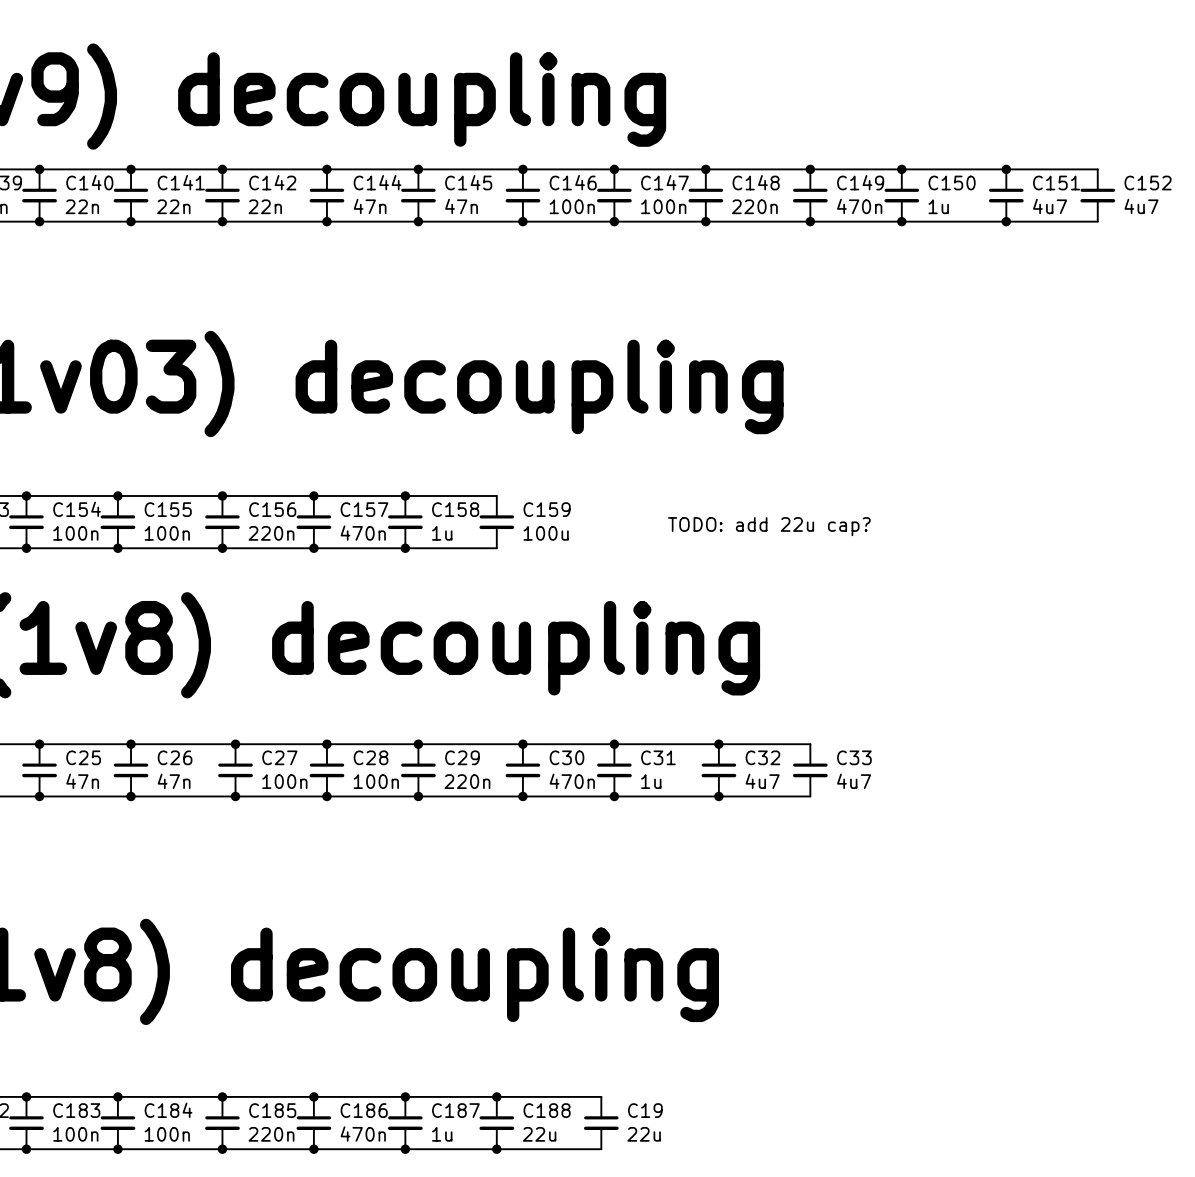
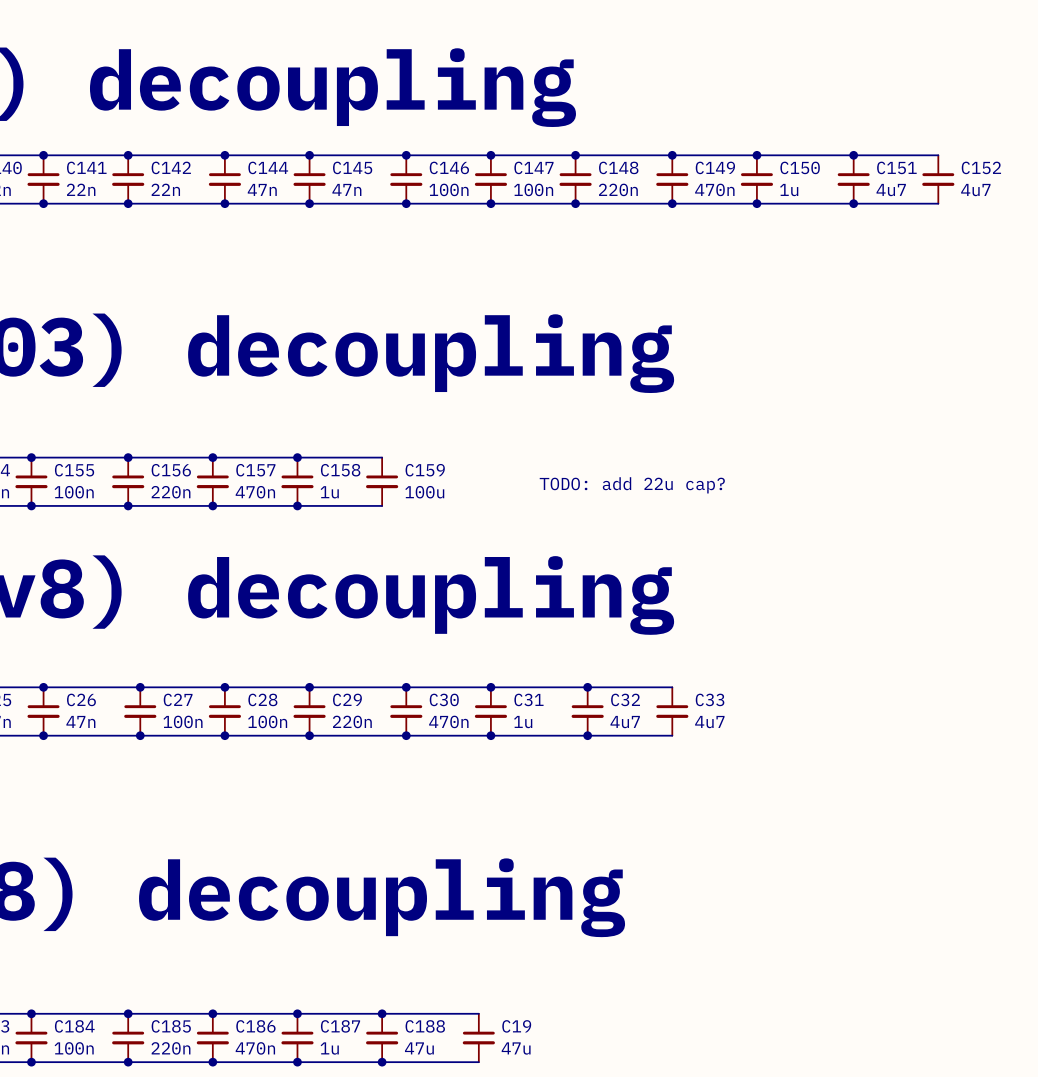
C188 value: 22u (539, 1134) -> 47u (419, 1048)
C19 value: 22u (644, 1134) -> 47u (516, 1048)

